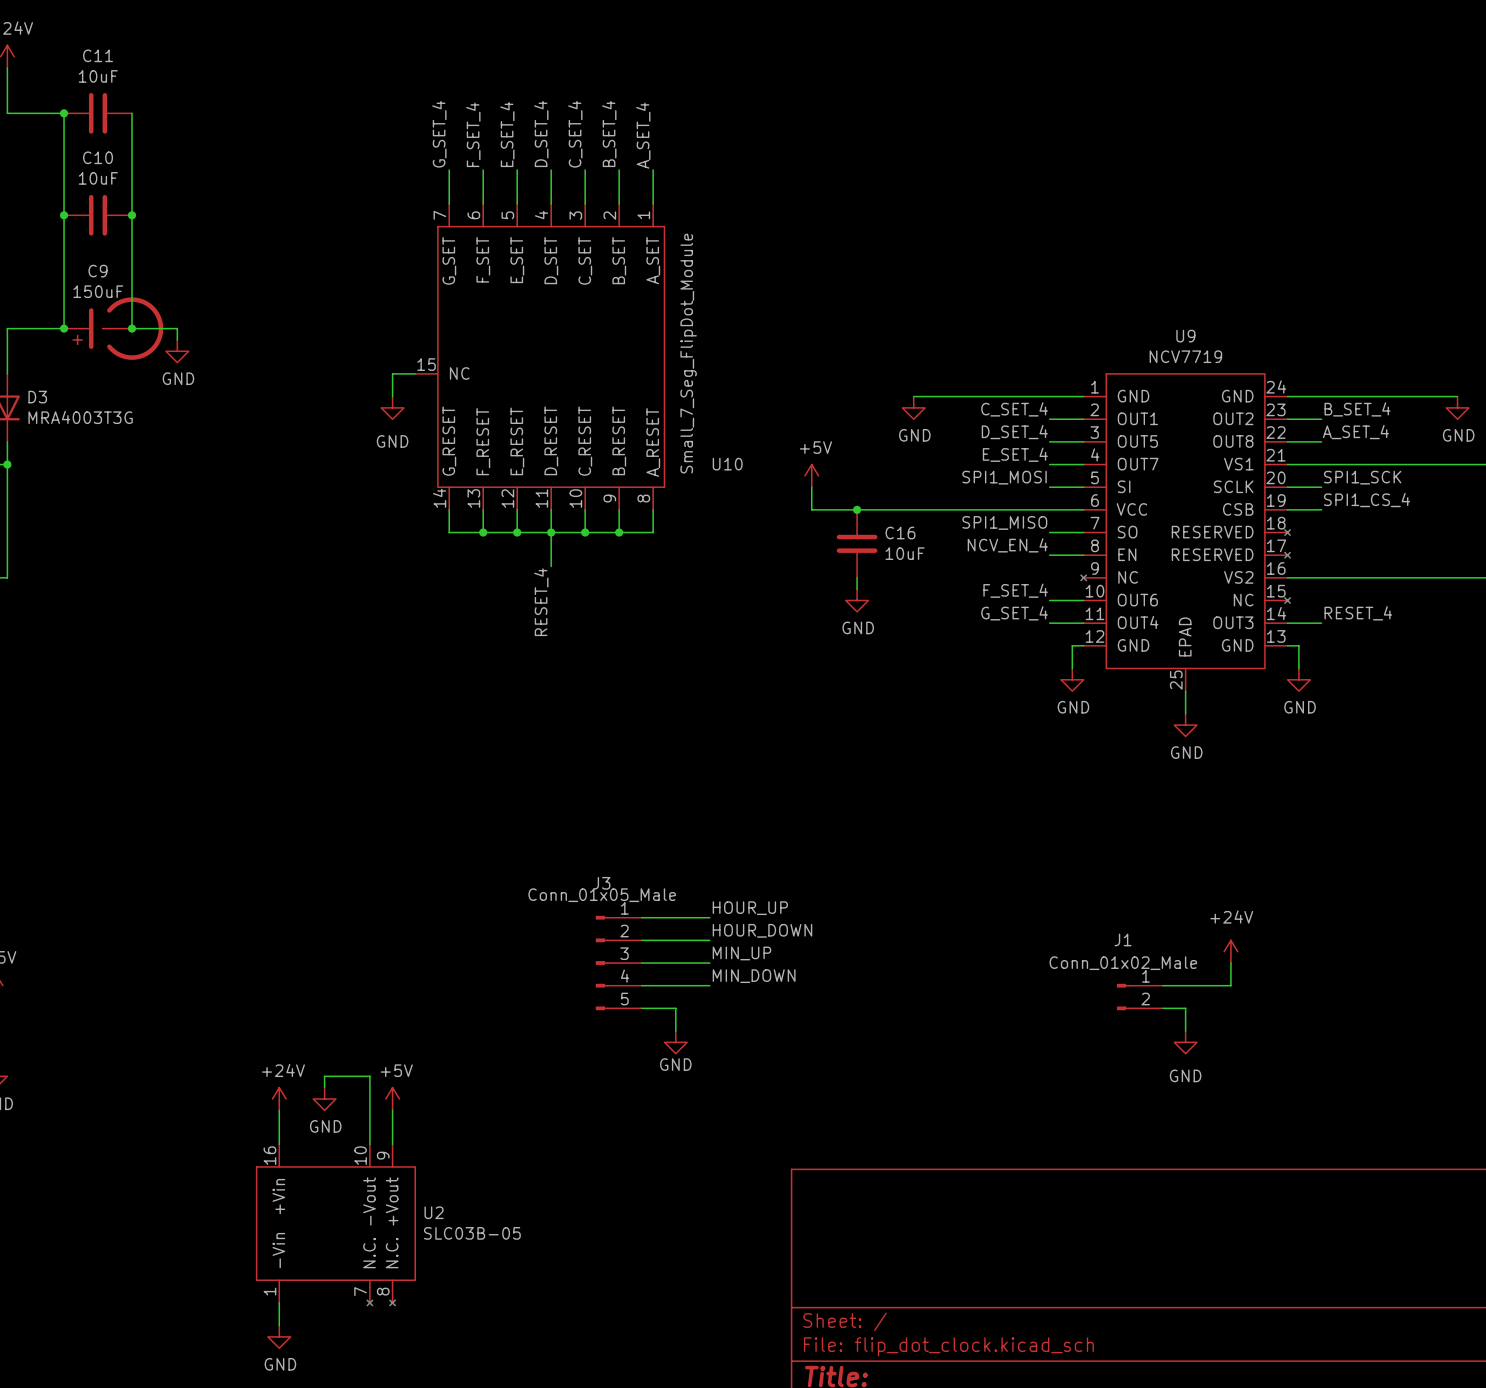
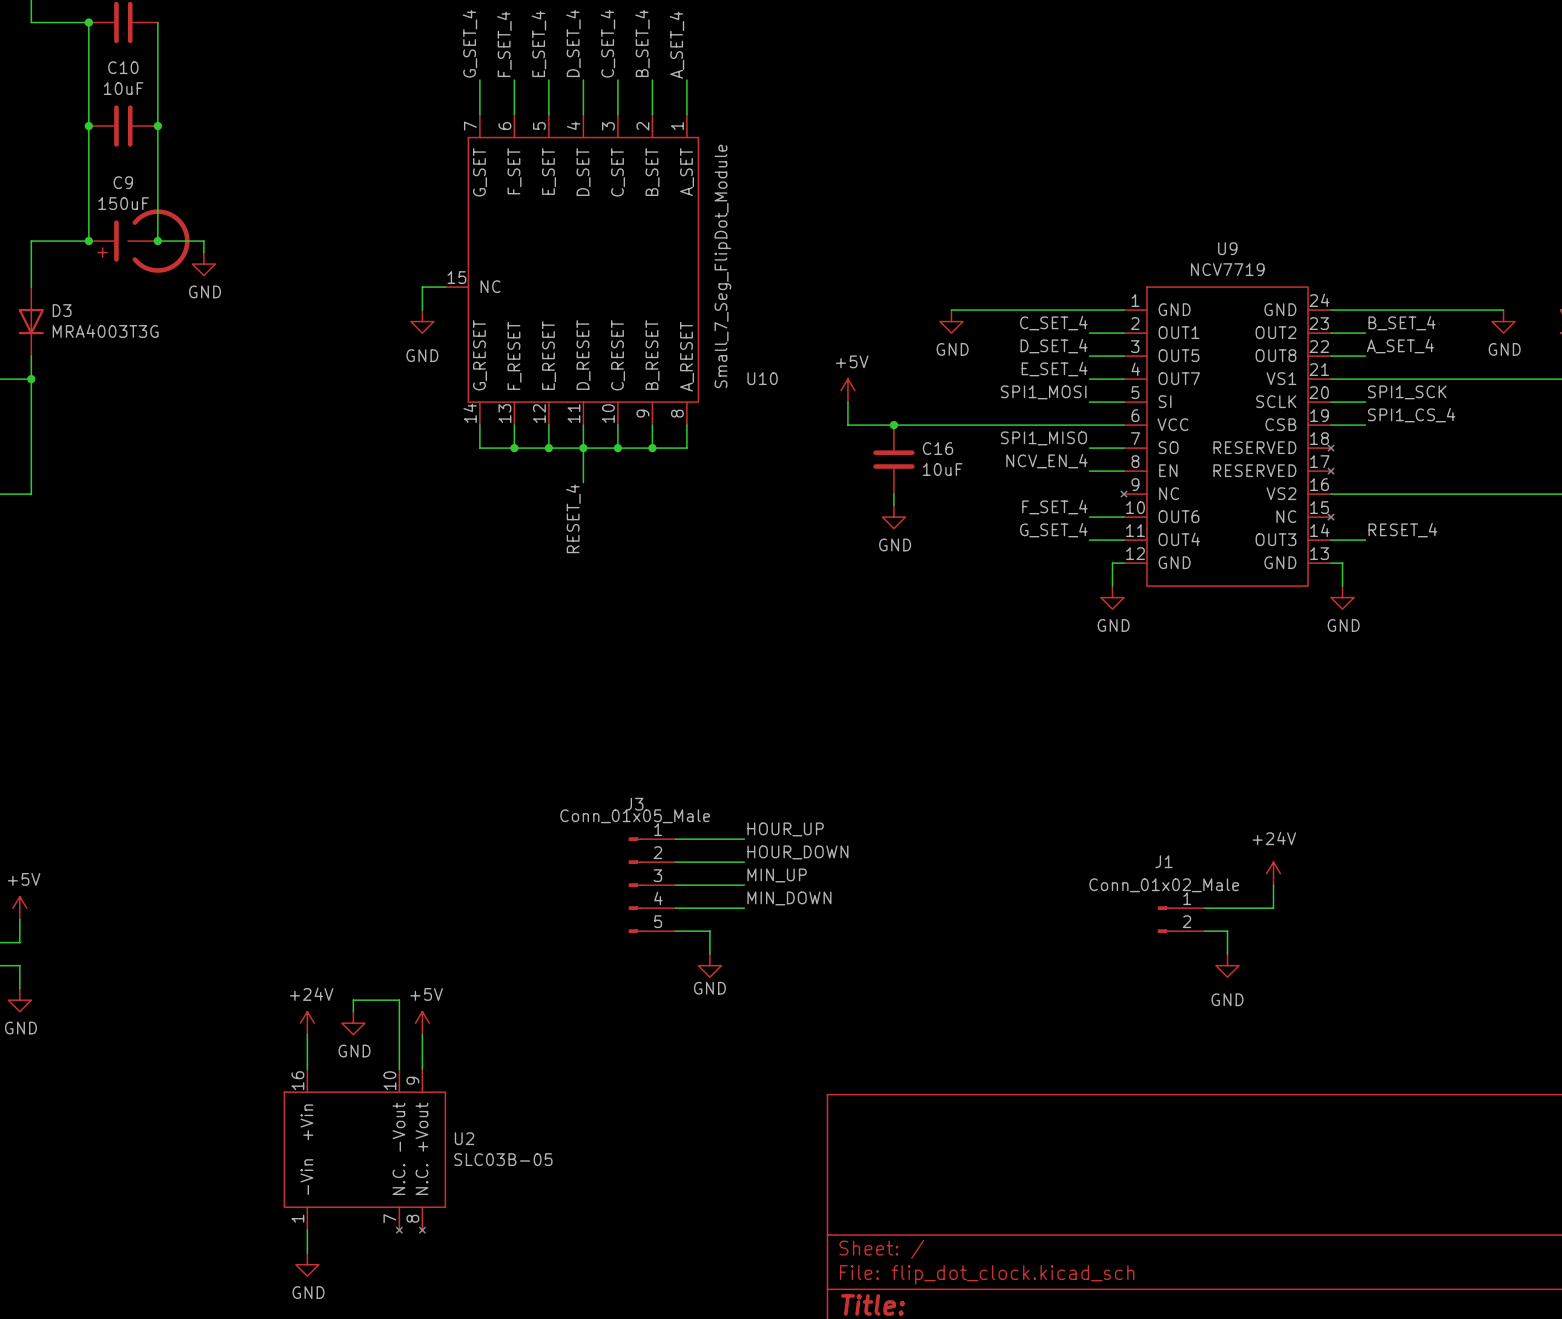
U9 symbol: [1080, 373, 1291, 692] -> [1121, 287, 1334, 587]
wire: (1185, 691) (1185, 713) -> none
power symbol: GND (1185, 725) -> none

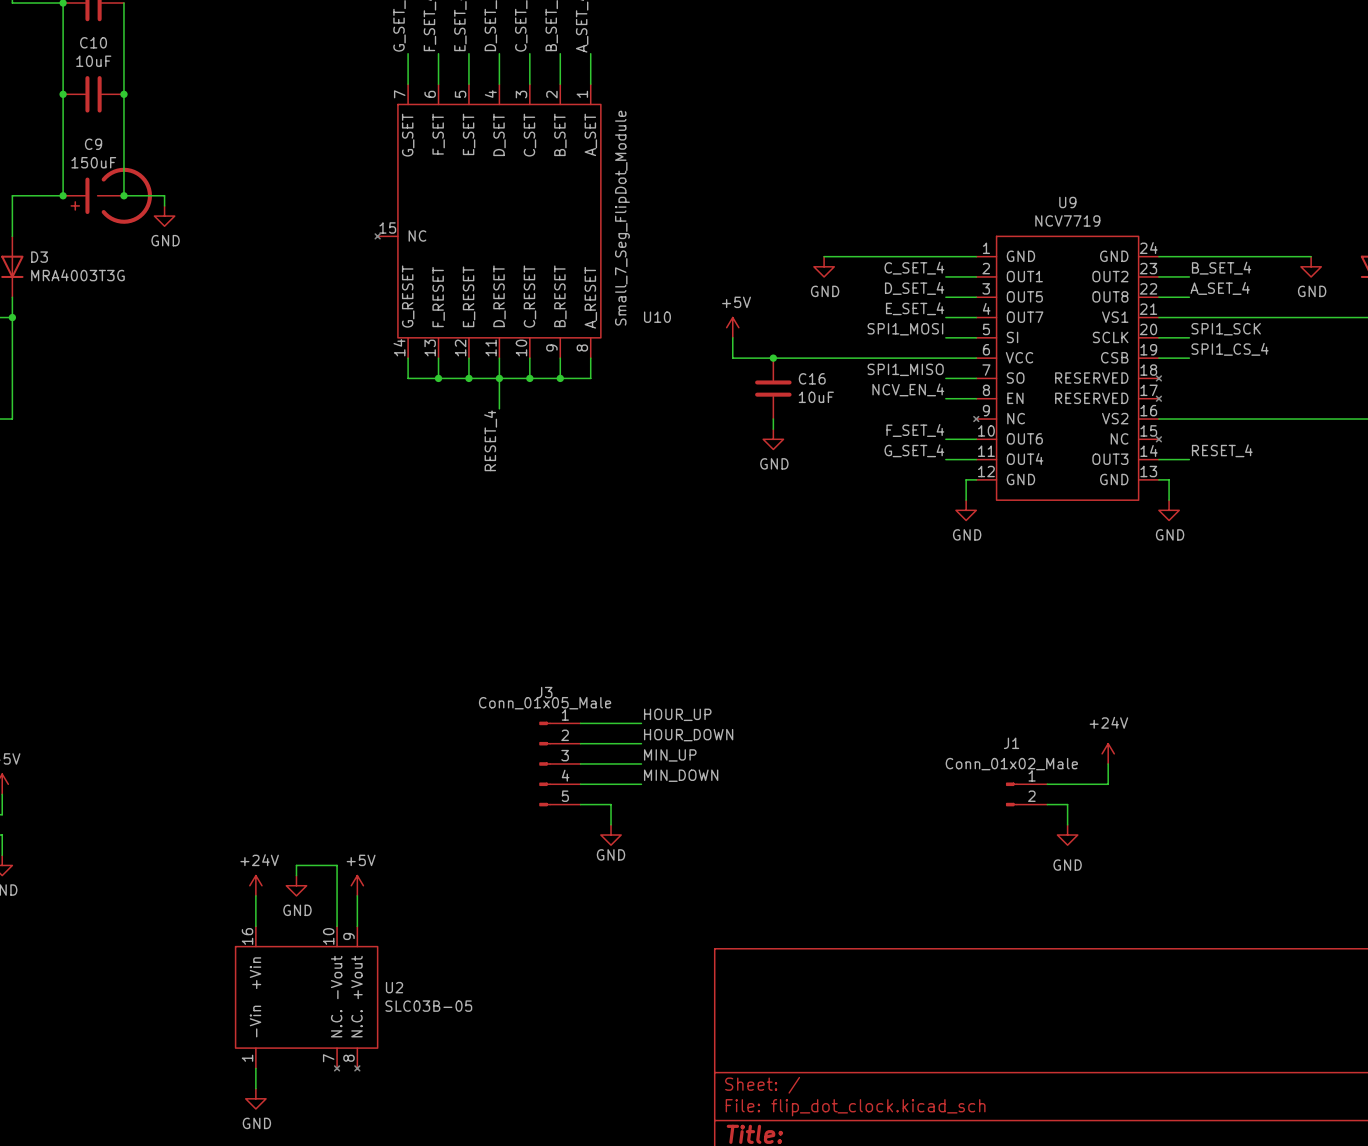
U10 symbol: [445, 114, 699, 426] -> [375, 84, 601, 359]
wire: (445, 287) (422, 287) (422, 310) -> none
power symbol: GND (422, 321) -> none

